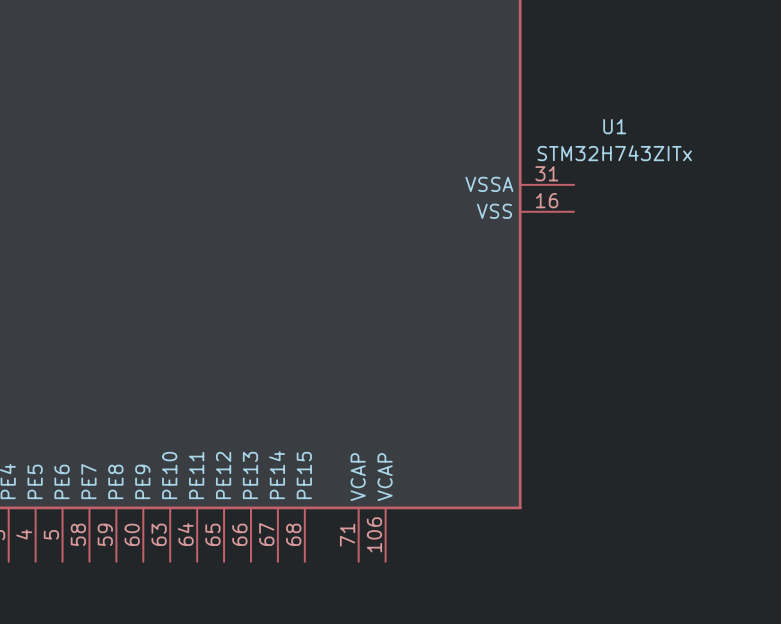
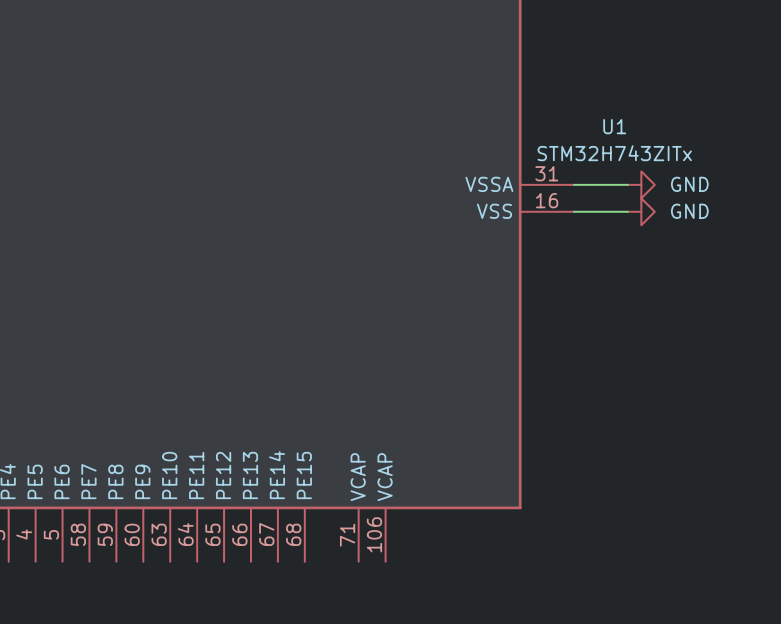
wire: none -> (574, 184) (627, 184)
power symbol: none -> GND (641, 184)
wire: none -> (574, 211) (627, 211)
power symbol: none -> GND (641, 211)

